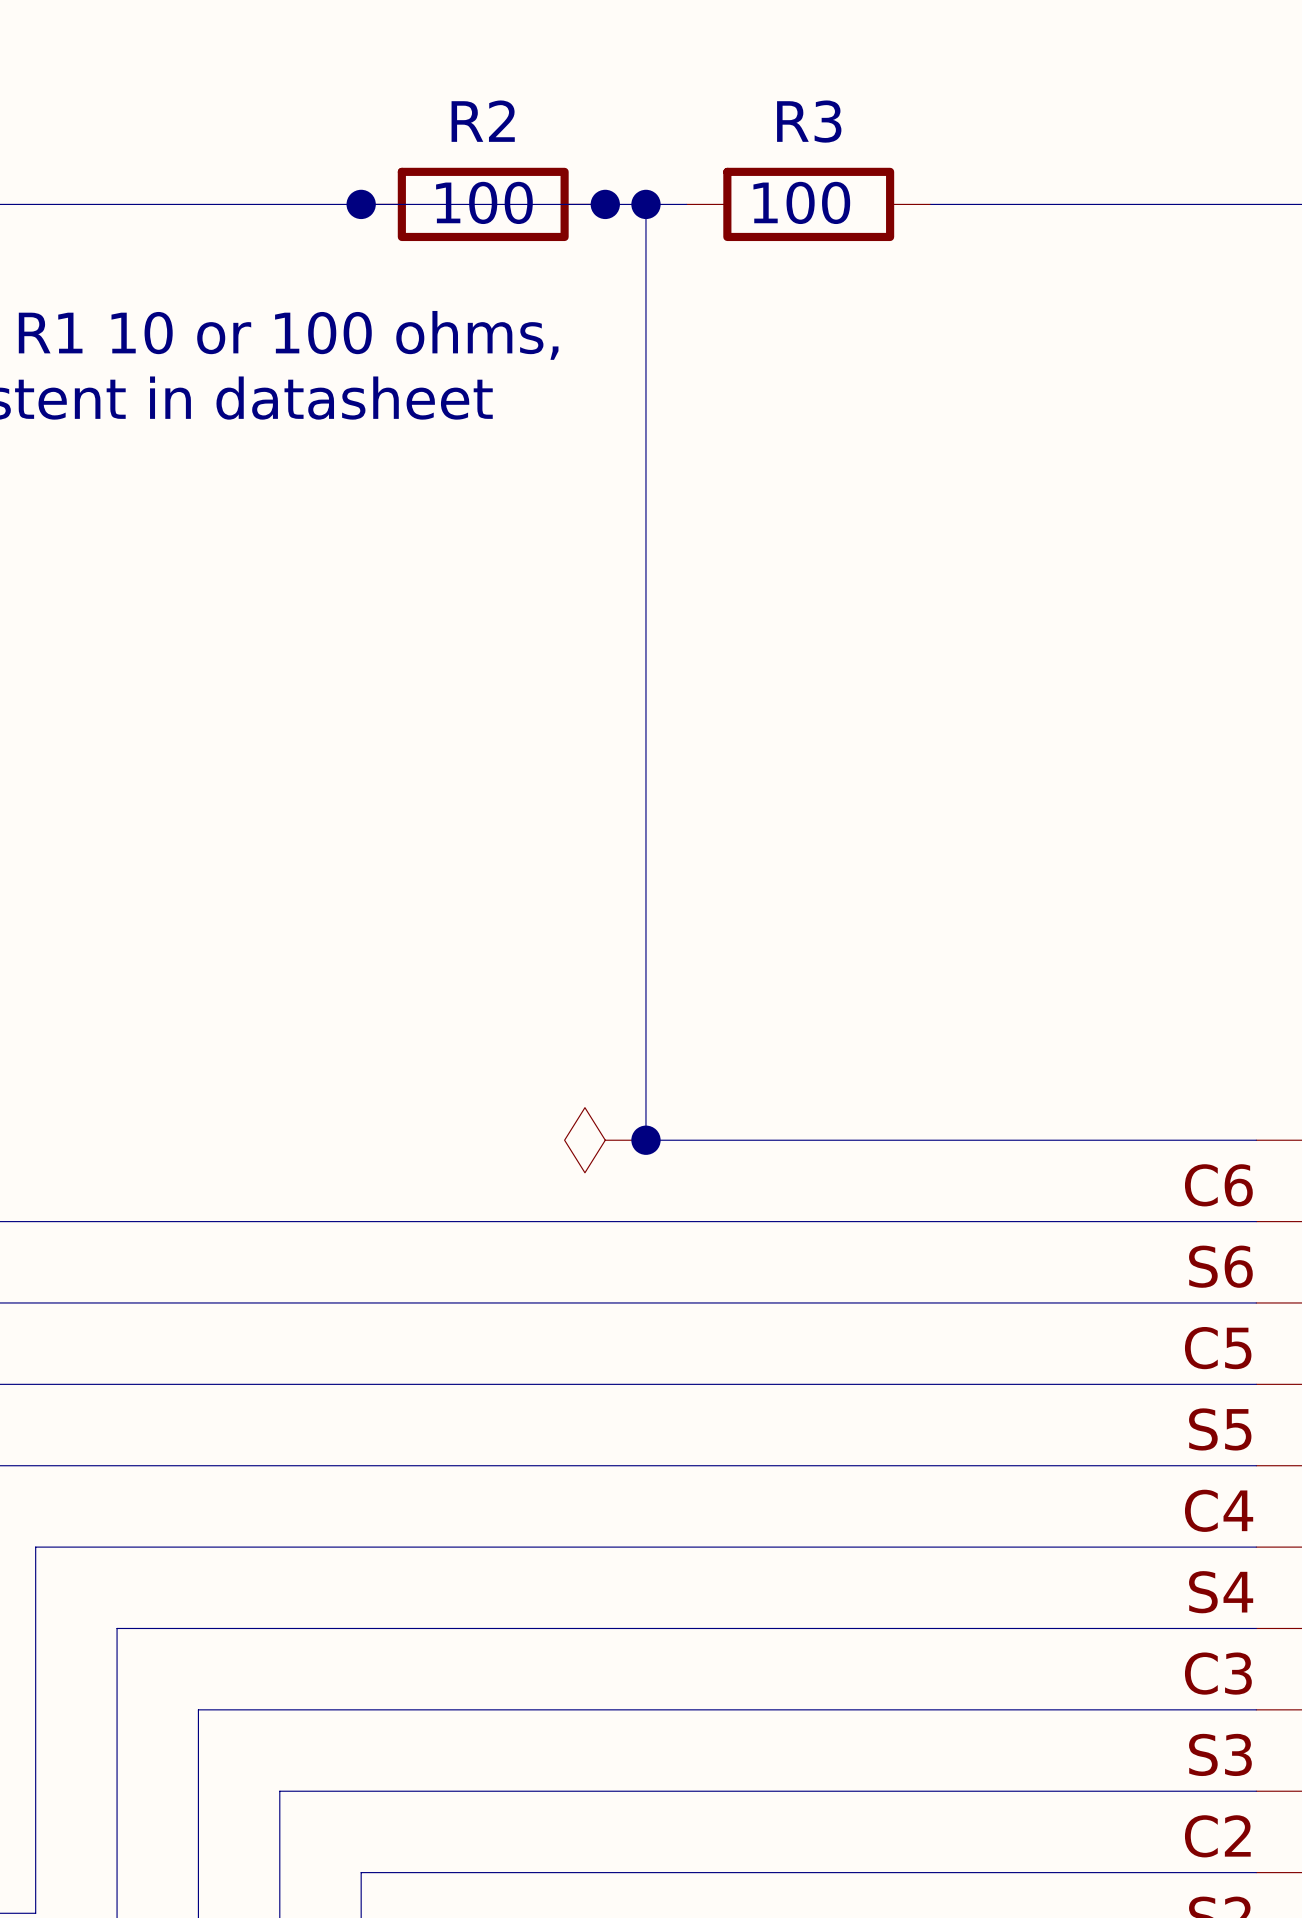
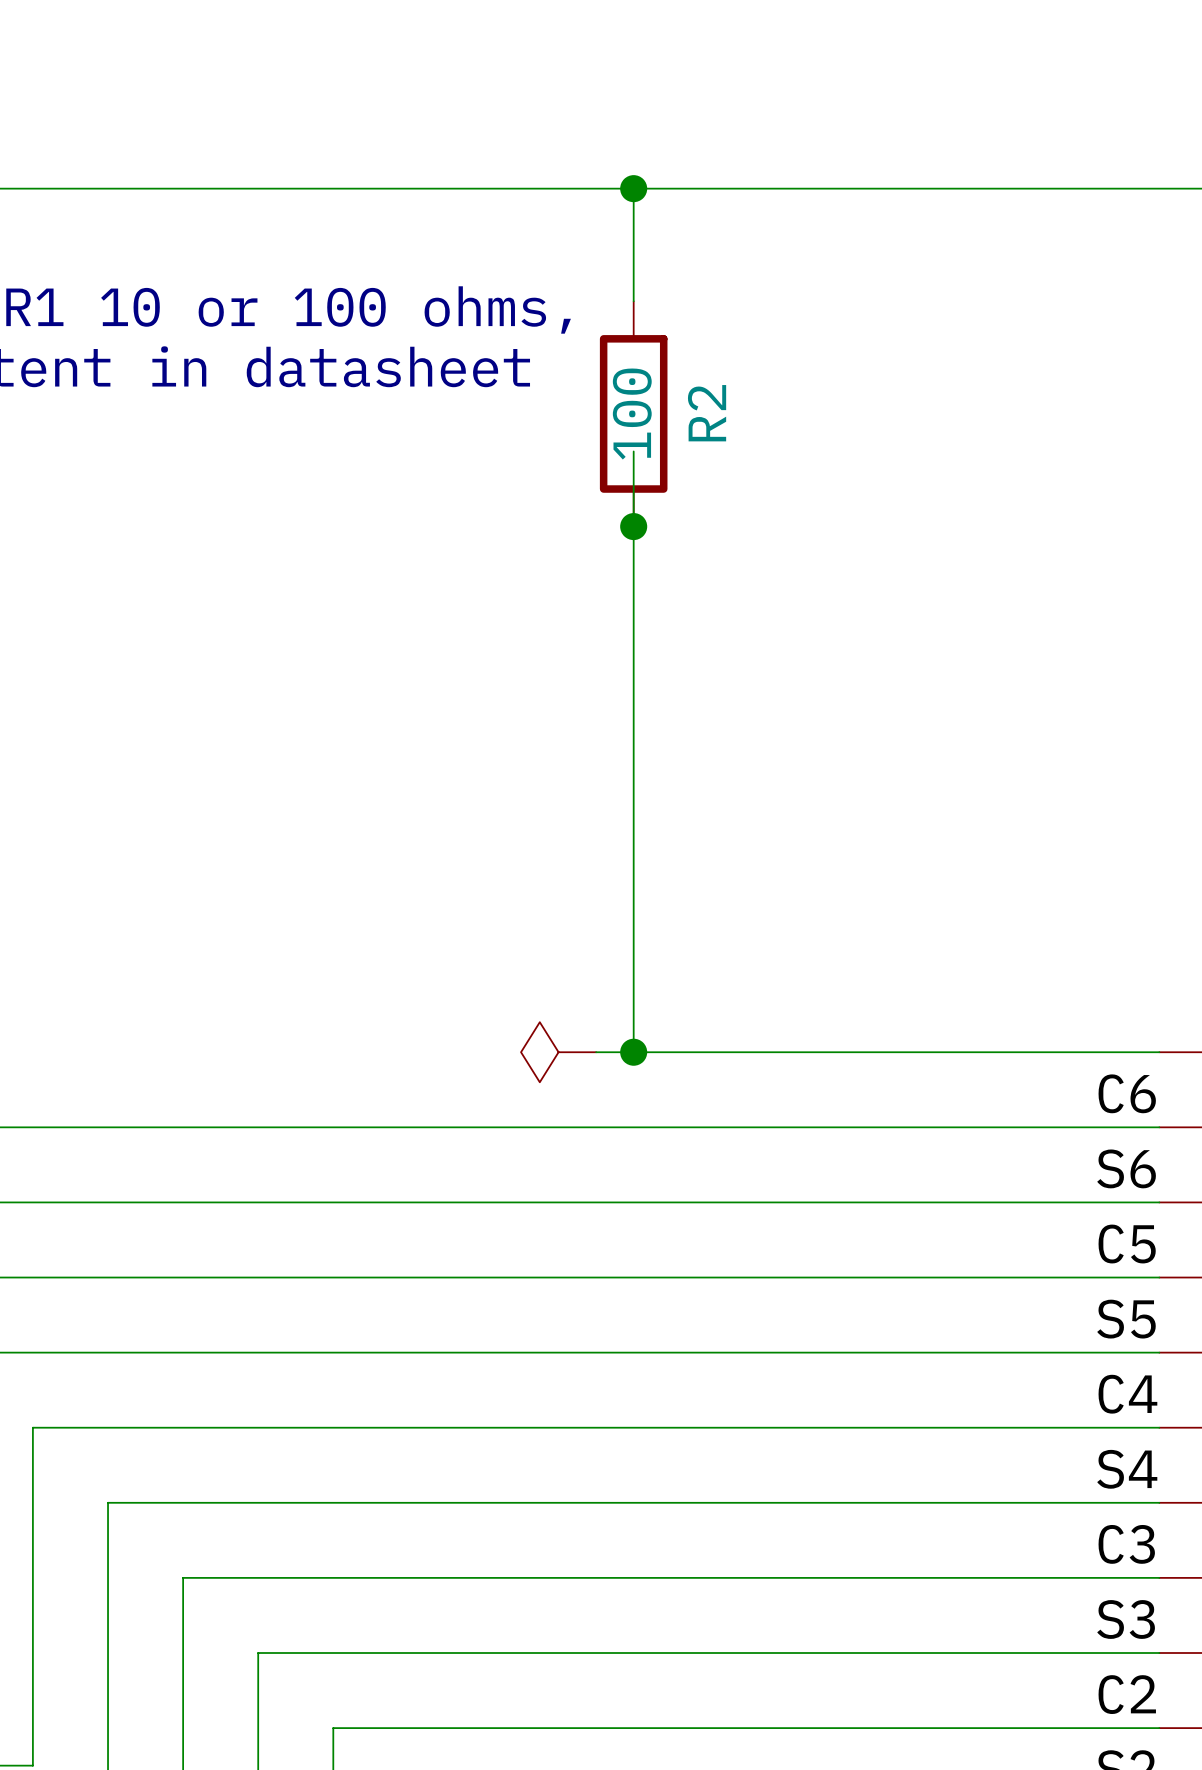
junction: (361, 204) -> none
R2 rotation: 0° (483, 204) -> 90° clockwise (633, 413)
R2 position: (483, 204) -> (633, 413)
junction: (605, 204) -> none
wire: (645, 204) (645, 1140) -> none
junction: (645, 204) -> none
junction: none -> (633, 188)
R3: 100 (808, 204) -> none
wire: none -> (858, 188) (633, 188) (633, 301)
wire: none -> (633, 451) (633, 1052)
junction: none -> (633, 526)
junction position: (645, 1140) -> (633, 1052)

